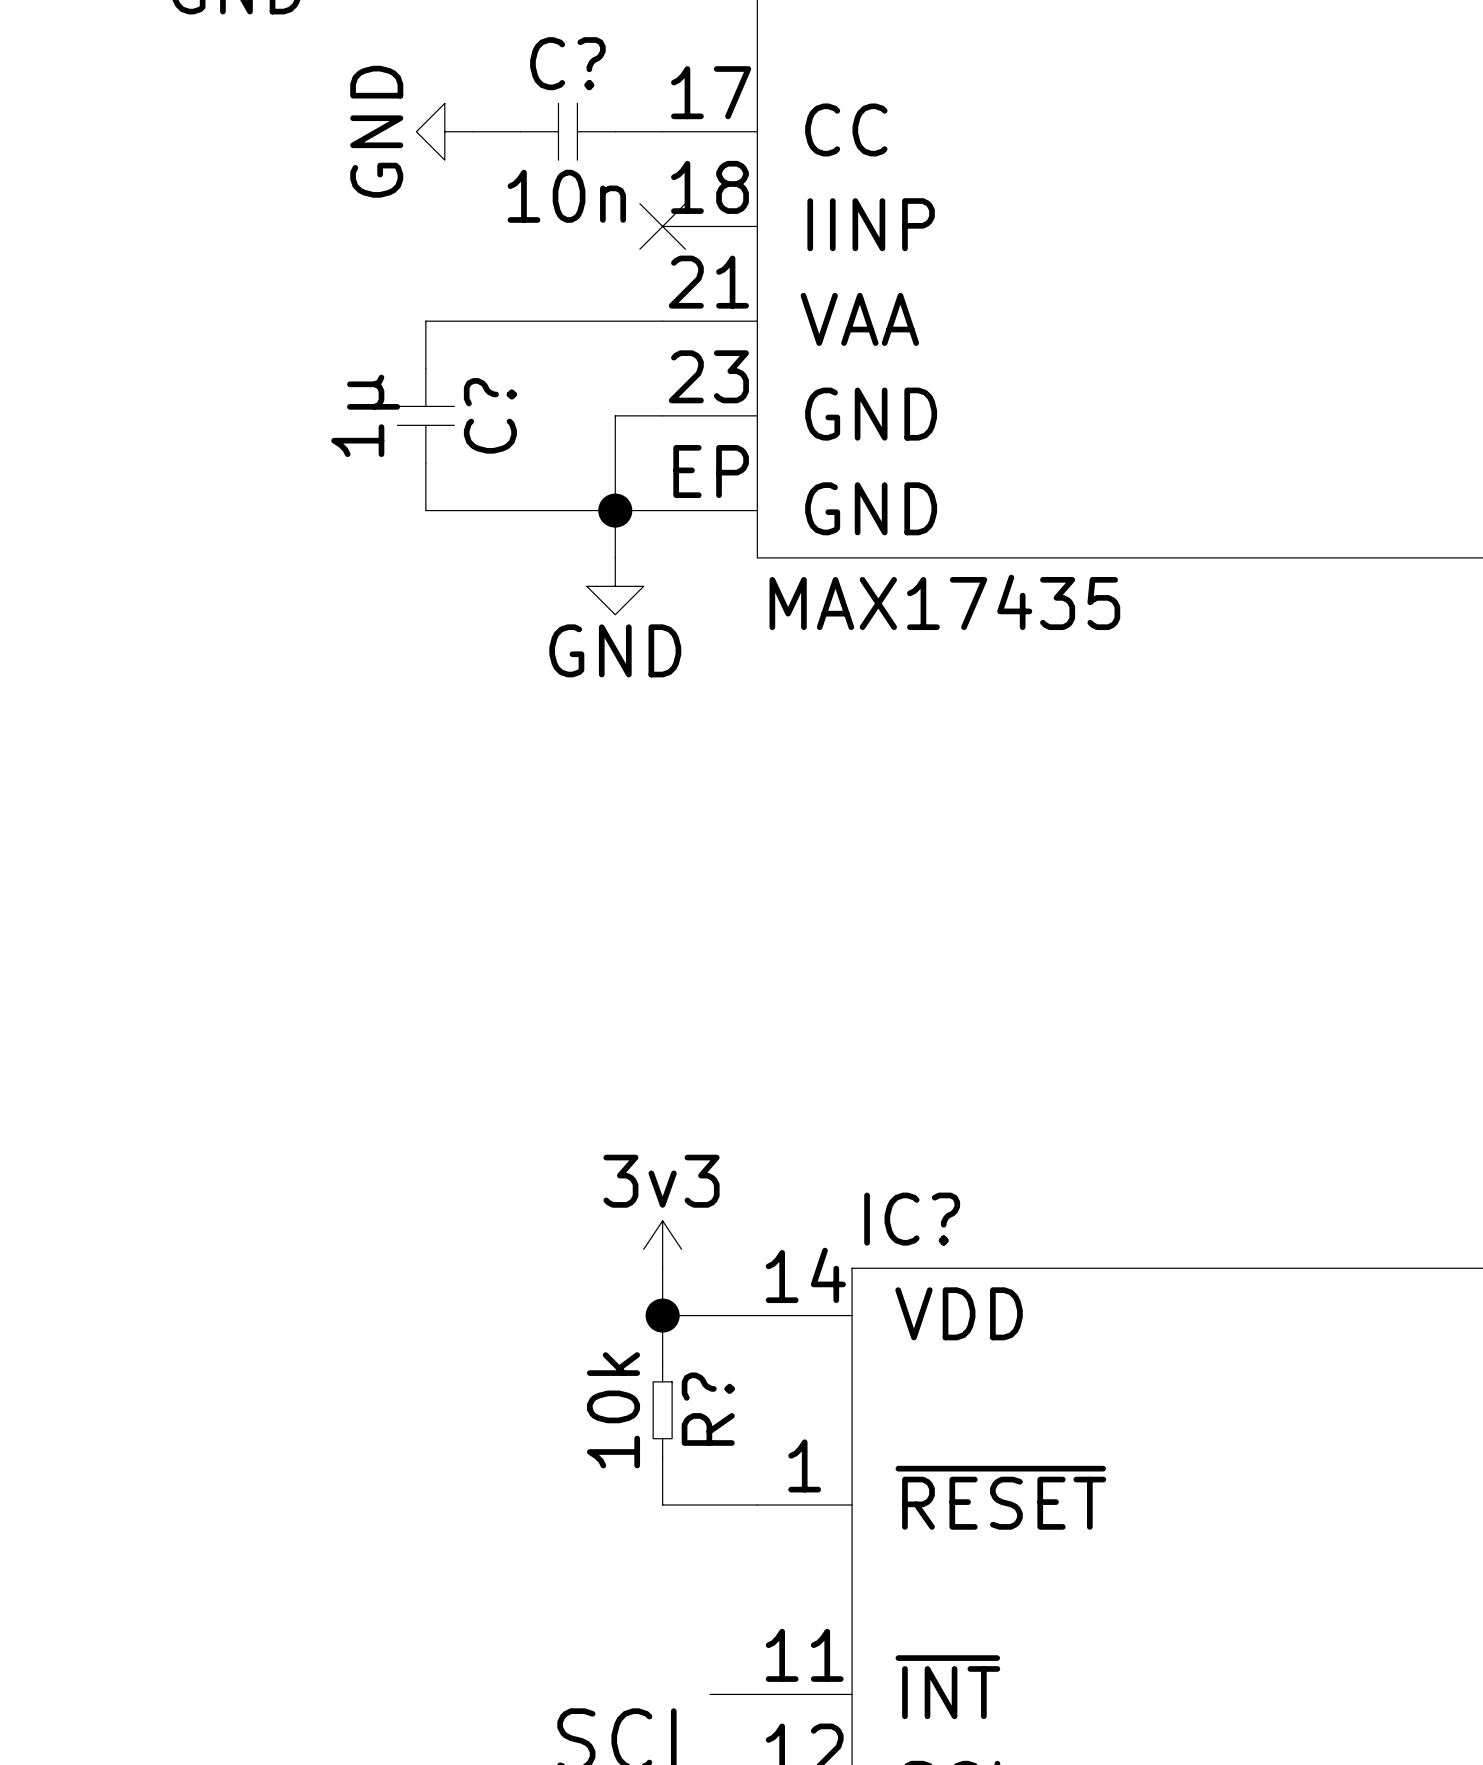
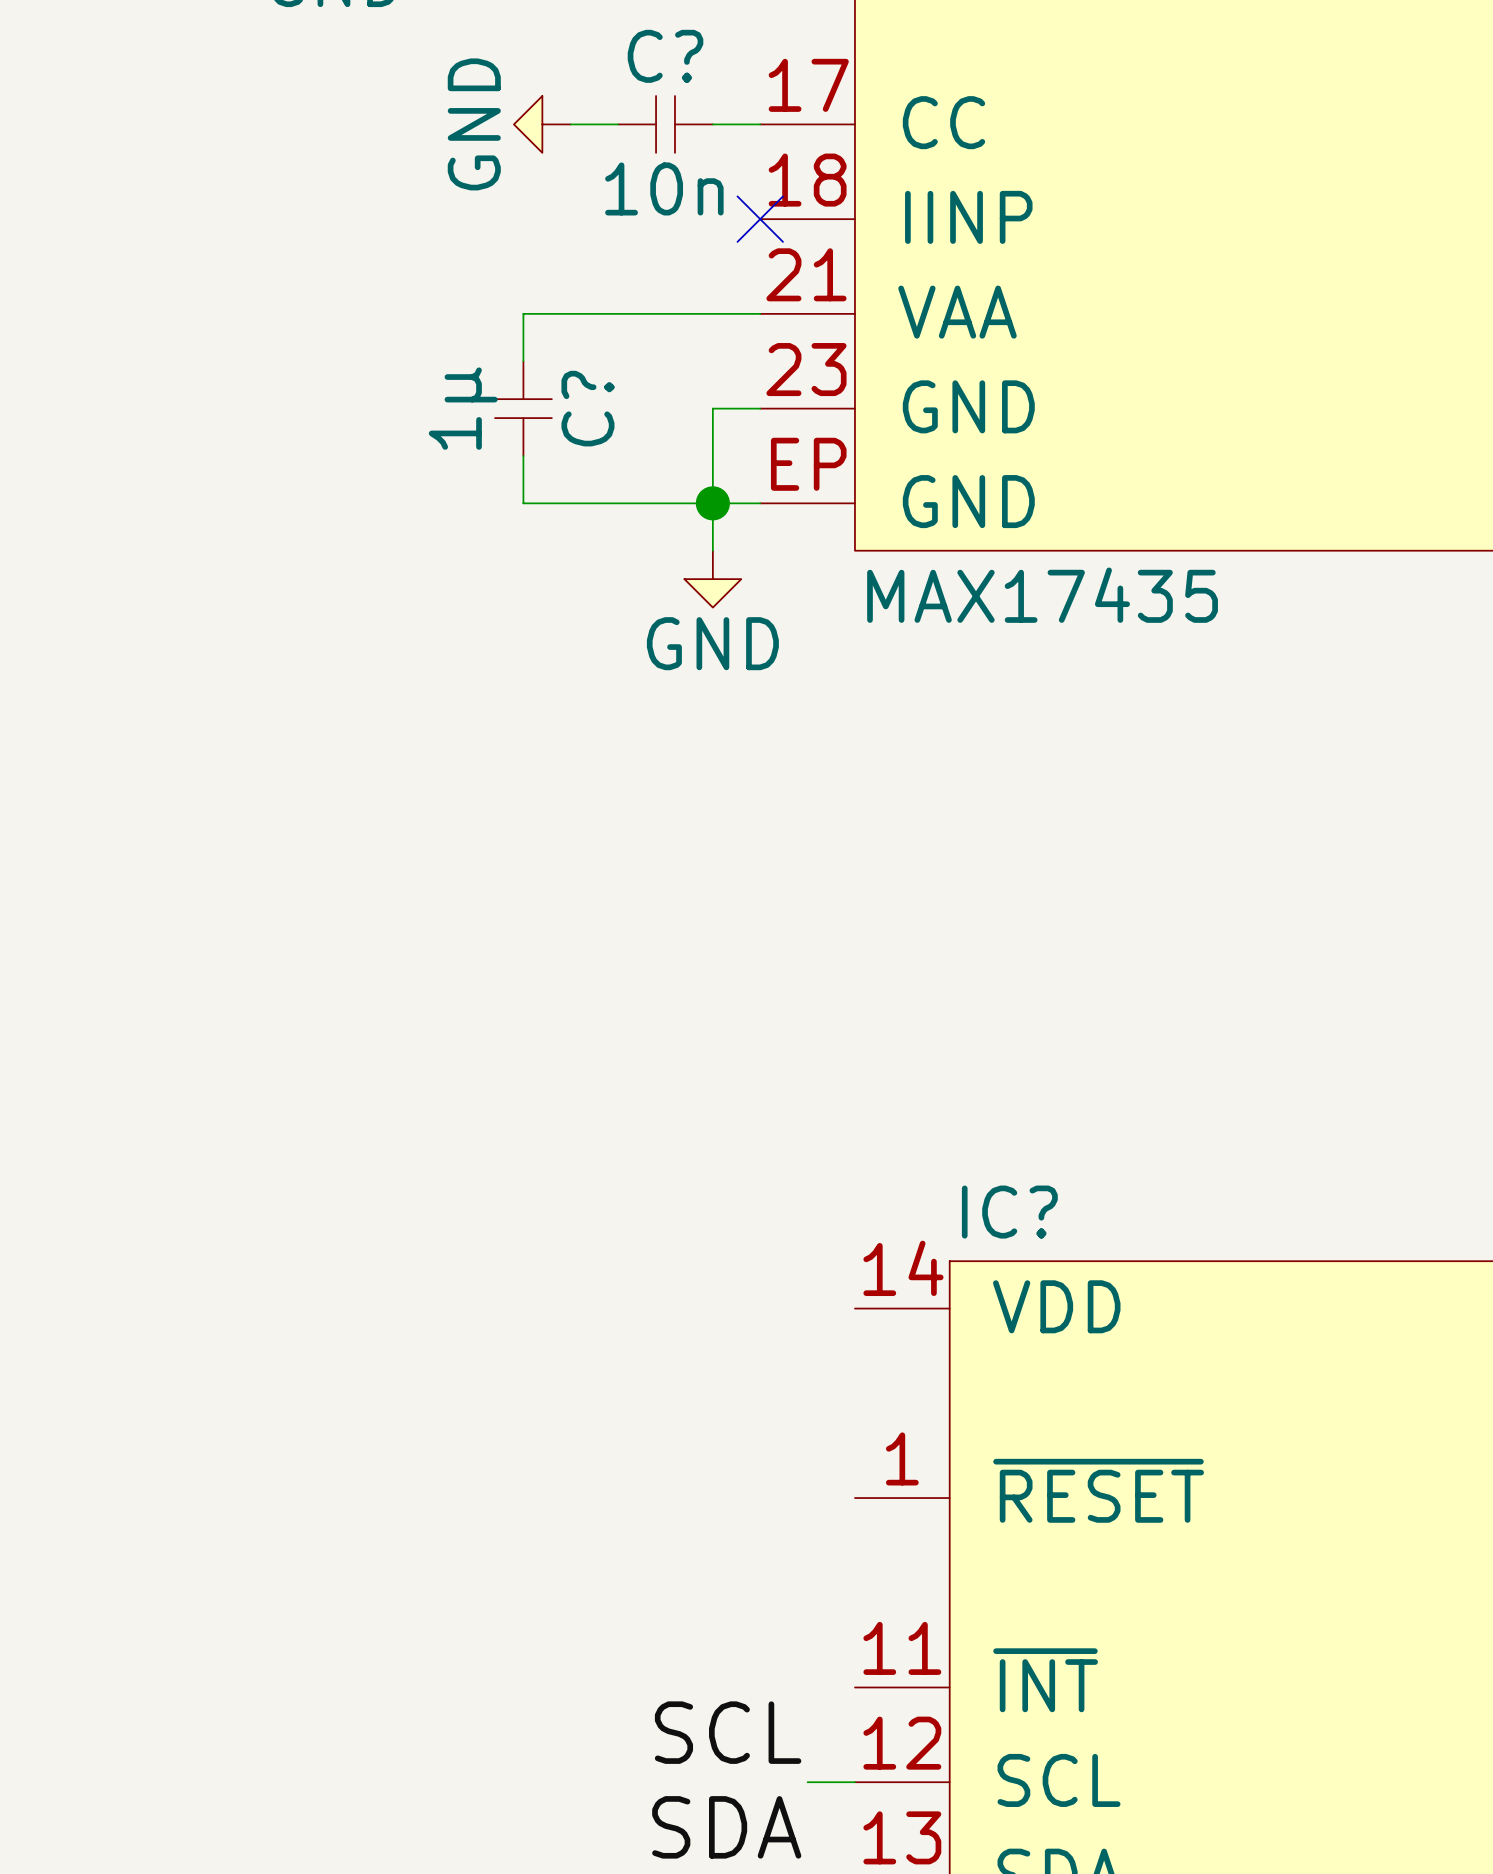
power symbol: 3v3 (662, 1244) -> none
wire: (662, 1268) (662, 1362) -> none
wire: (662, 1315) (757, 1315) -> none
junction: (662, 1315) -> none
R?: 10k (662, 1410) -> none
wire: (662, 1457) (662, 1505) (757, 1505) -> none
wire: (709, 1694) (757, 1694) -> none

